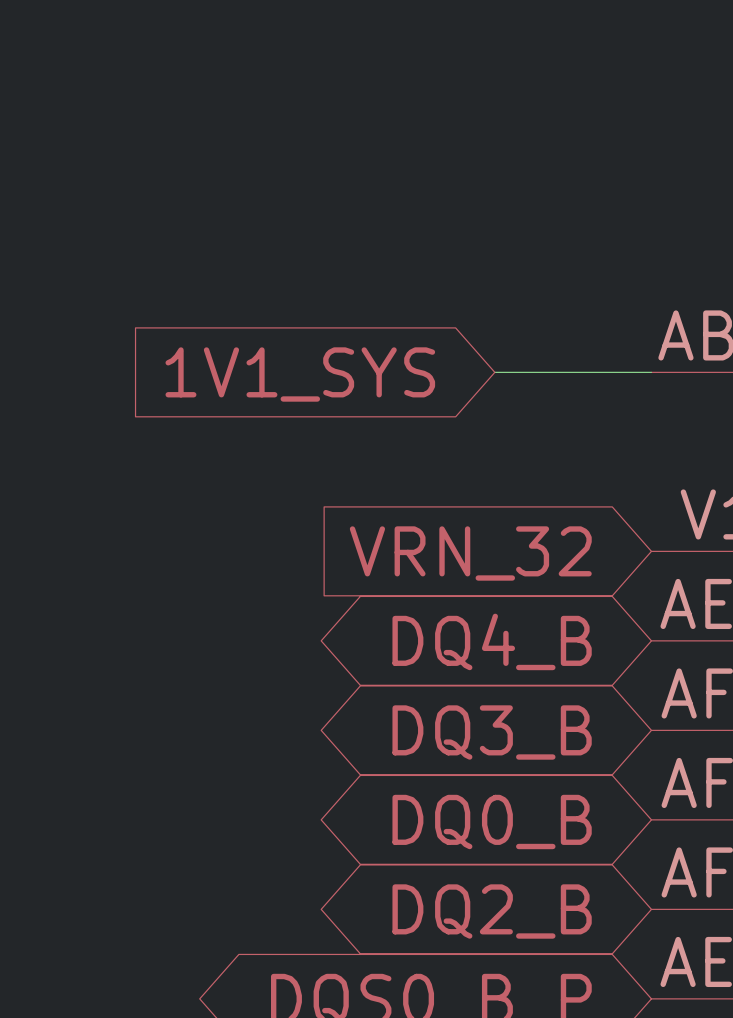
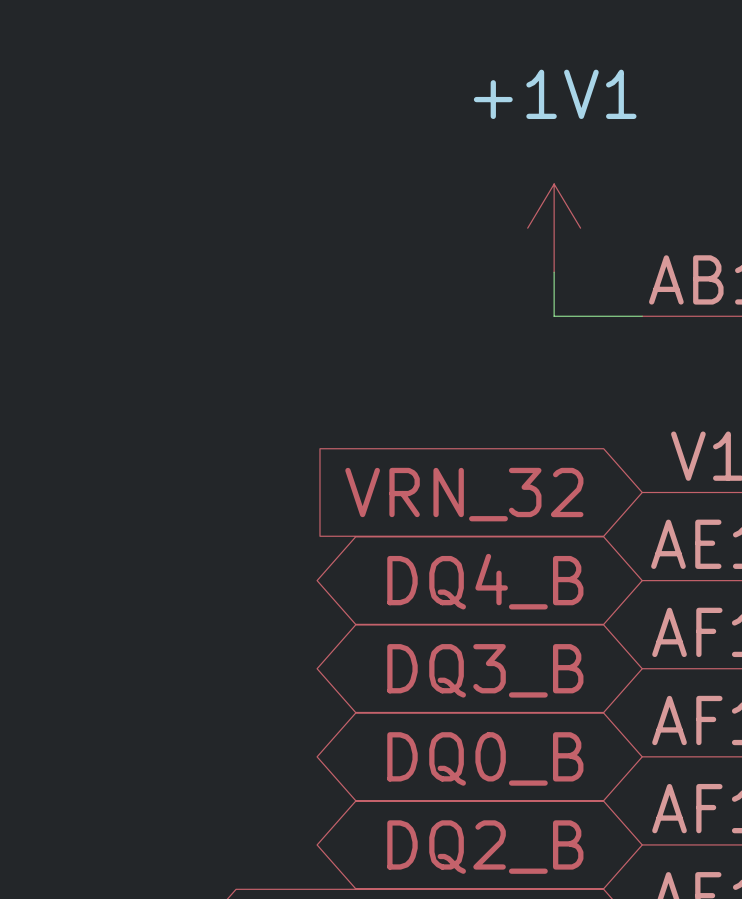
power symbol: none -> +1V1 (554, 228)
wire: (494, 372) (561, 372) -> (554, 272) (554, 316)
global label: 1V1_SYS (300, 374) -> none

